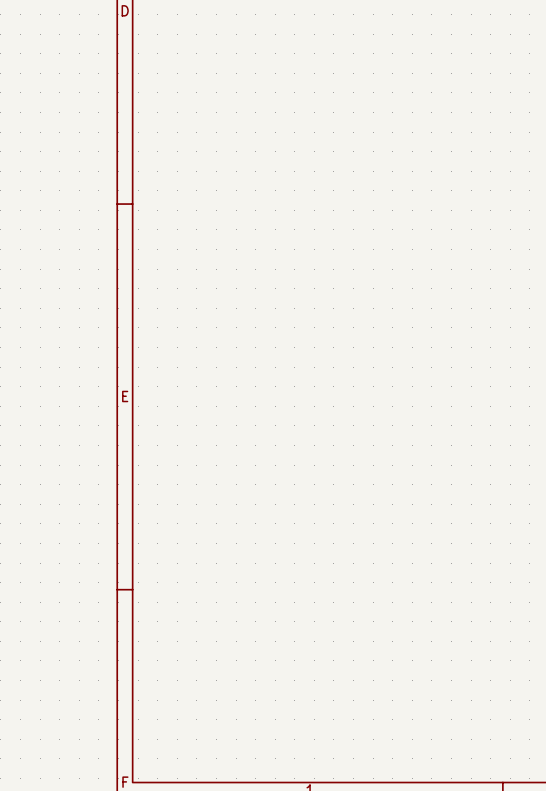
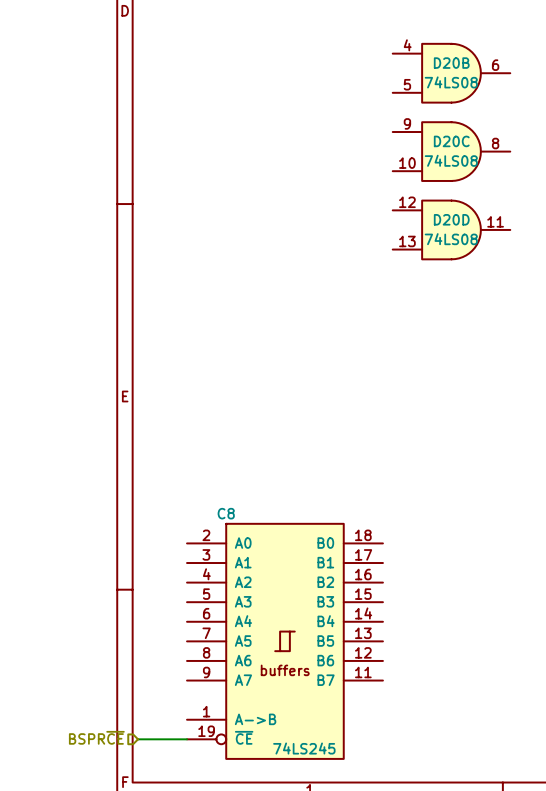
D20B: none -> 74LS08 (451, 73)
D20C: none -> 74LS08 (451, 151)
D20D: none -> 74LS08 (451, 229)
C8: none -> 74LS245 (284, 641)
hierarchical label: none -> BSPR~{CE} (96, 737)
wire: none -> (138, 739) (187, 739)

